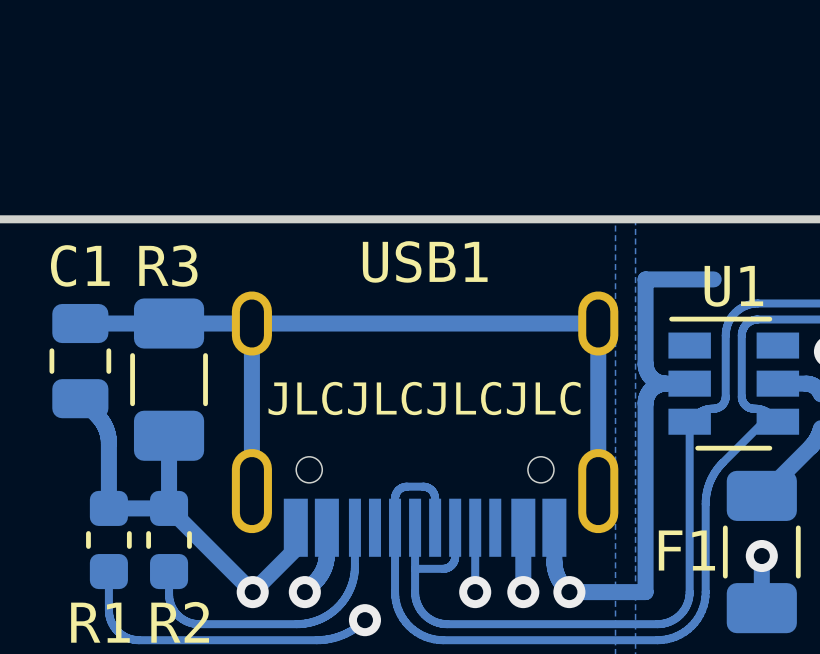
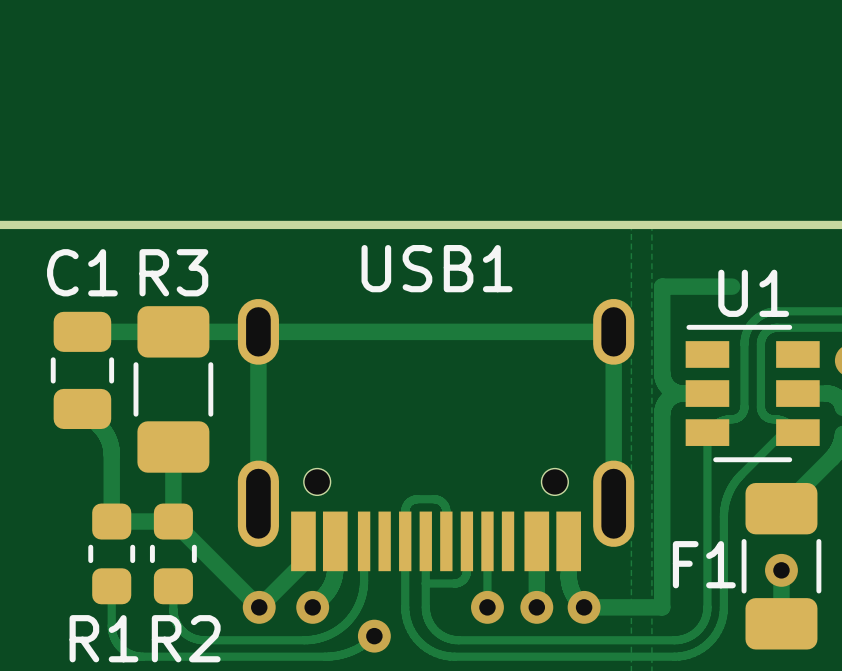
drawing: [268, 381, 581, 416] -> none

